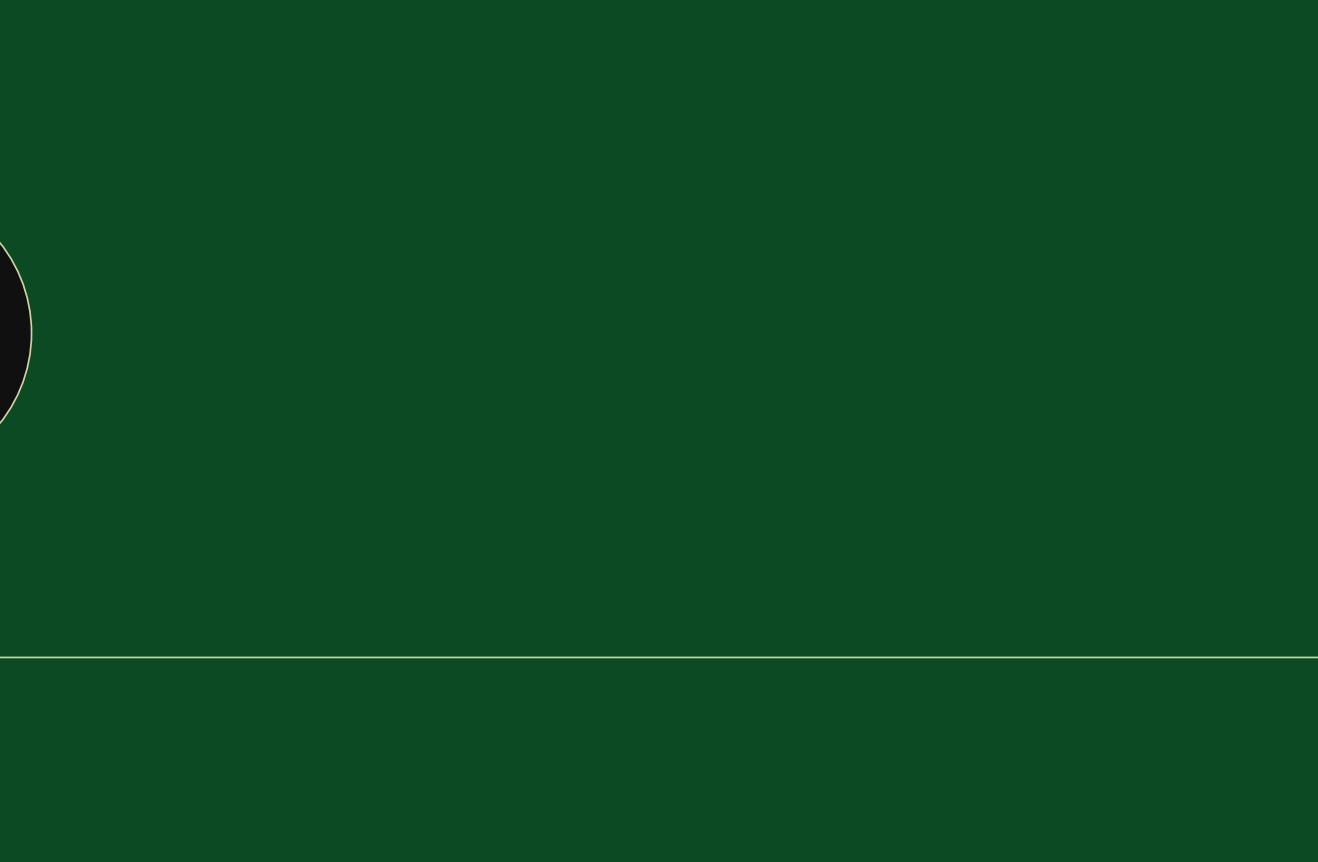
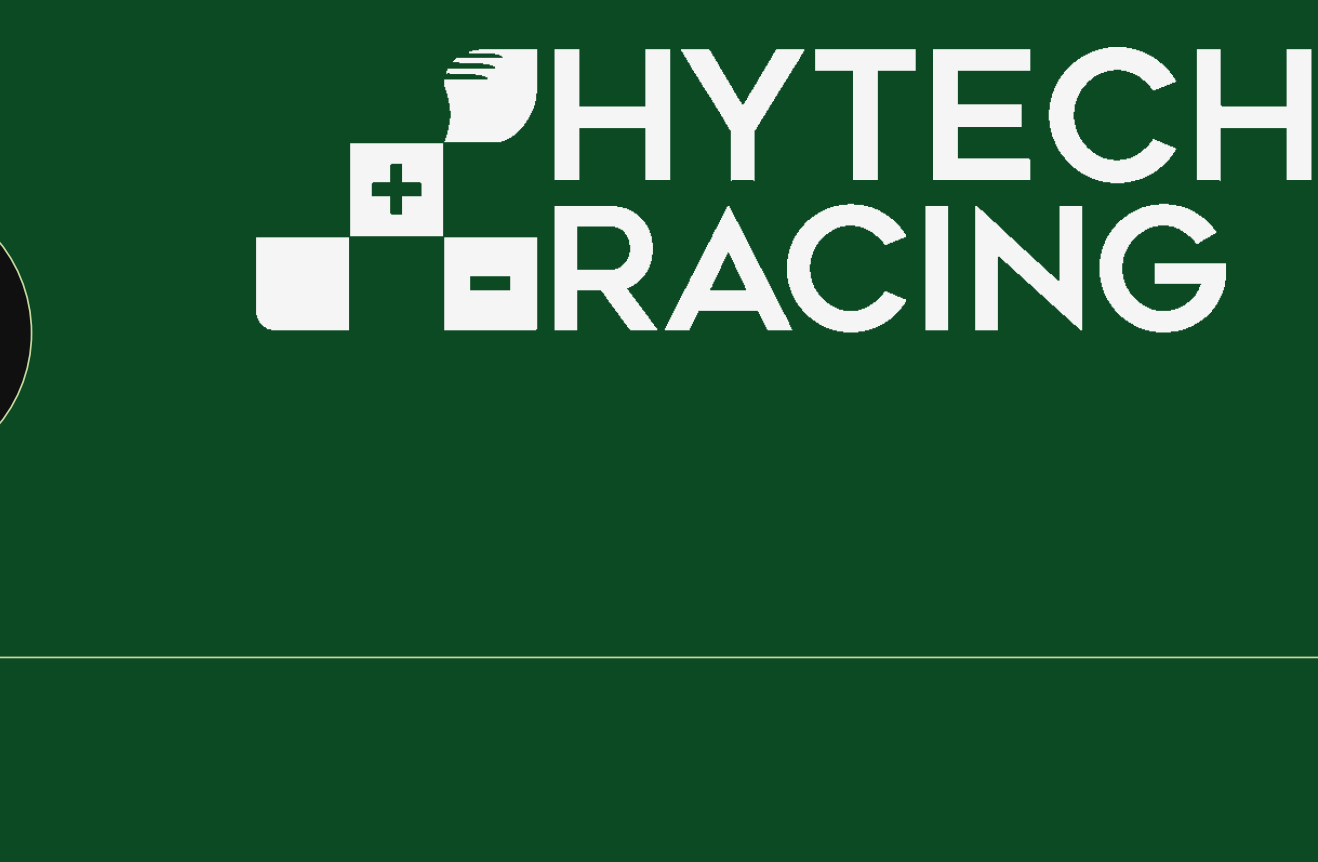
drawing: none -> [256, 47, 1312, 333]

